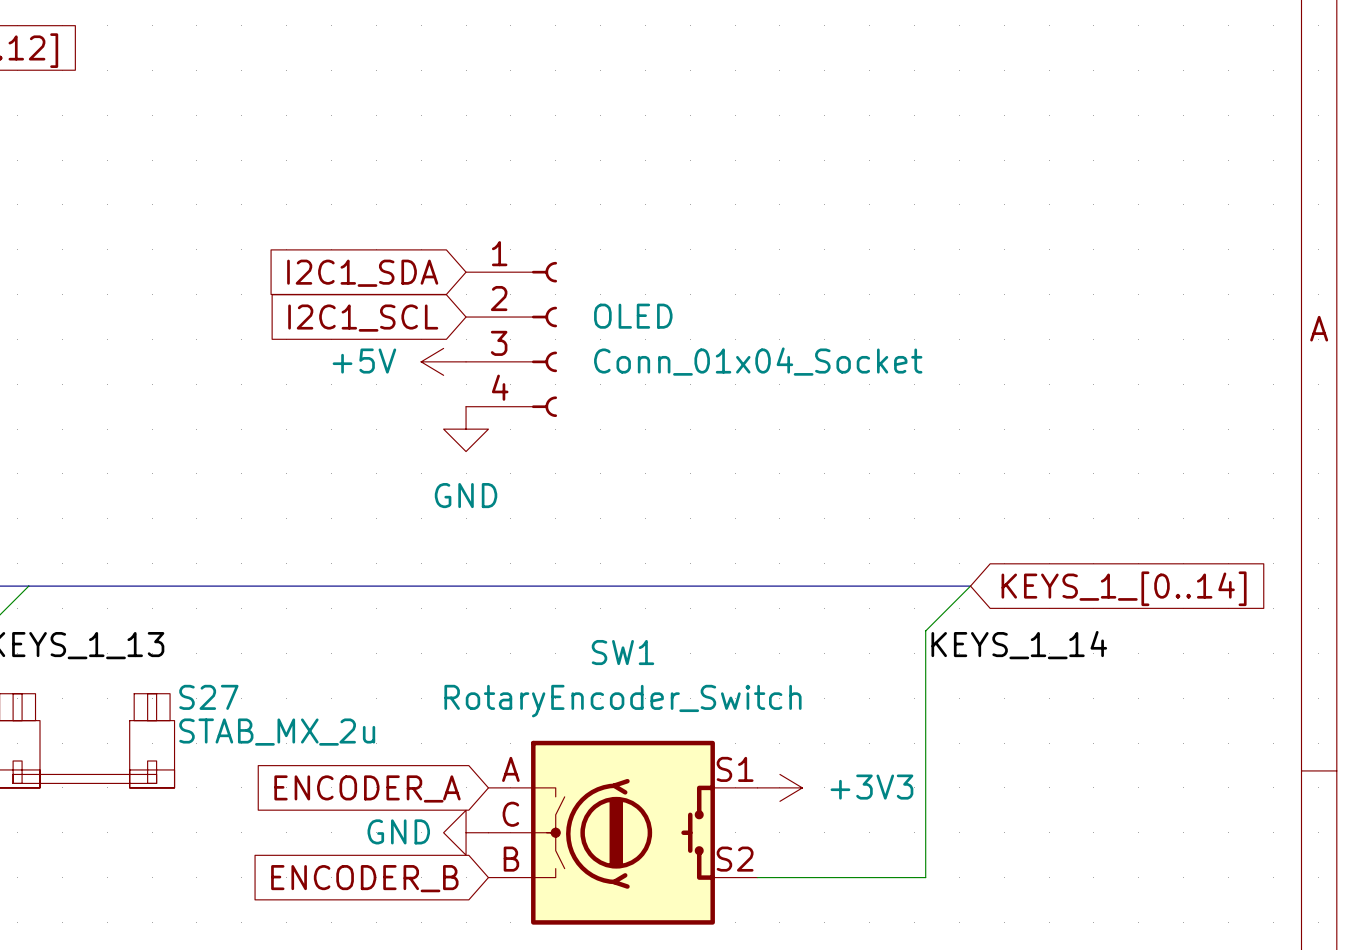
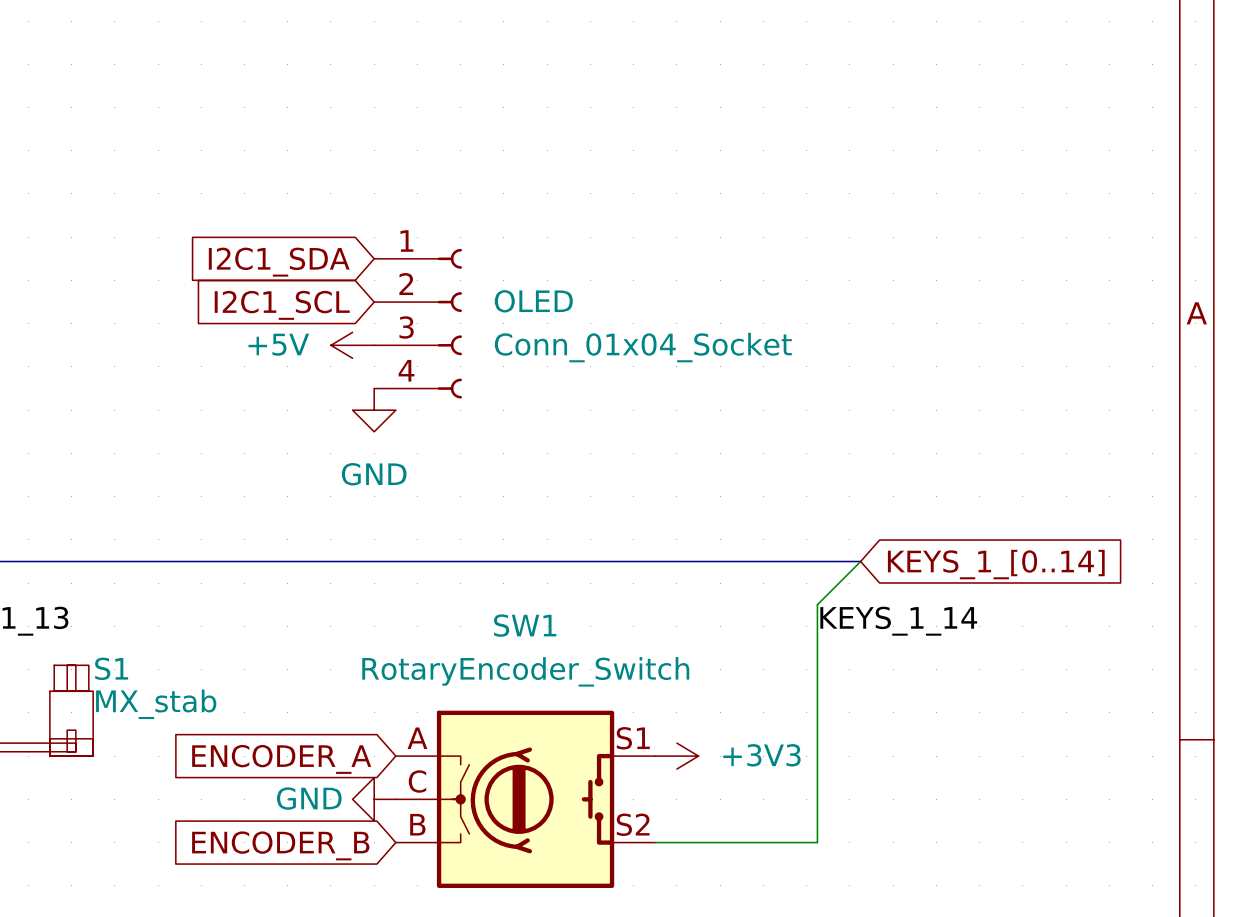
S27 name: S27 (208, 697) -> S1 (111, 668)
S27 value: STAB_MX_2u (277, 732) -> MX_stab (156, 704)

